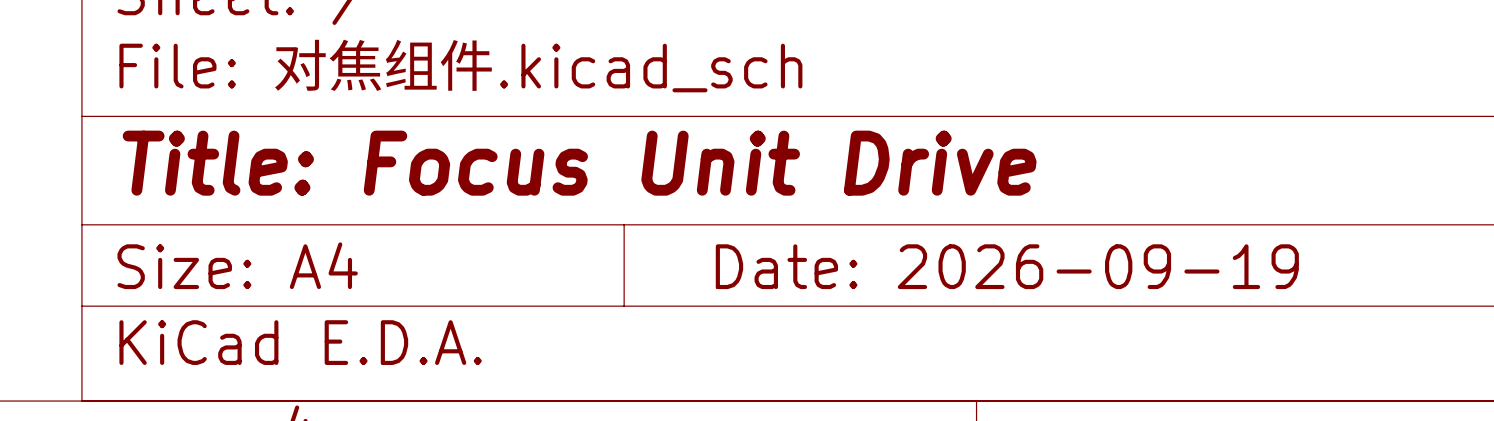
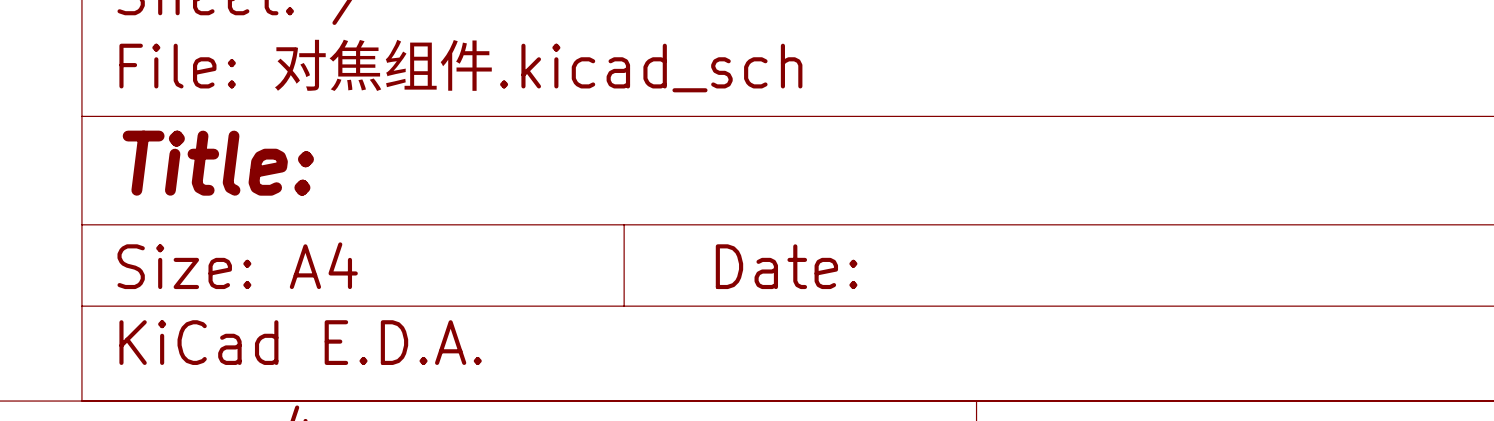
title block: Title: Focus Unit Drive (579, 163) -> Title: (218, 163)
title block: Date: 2026-09-19 (1007, 266) -> Date: (786, 266)

